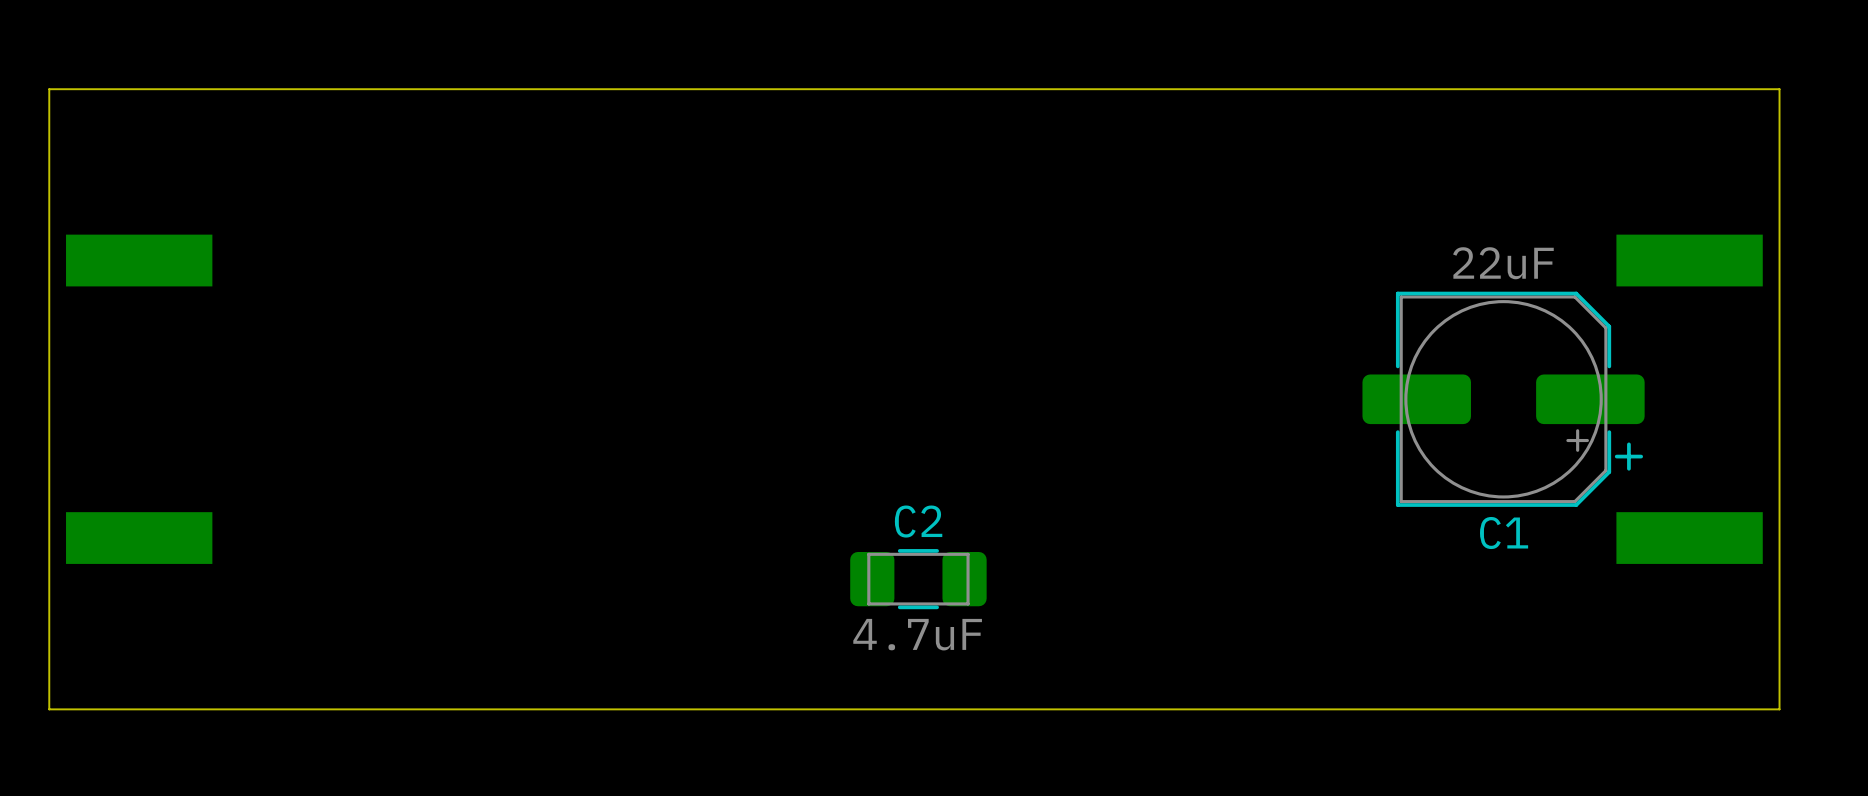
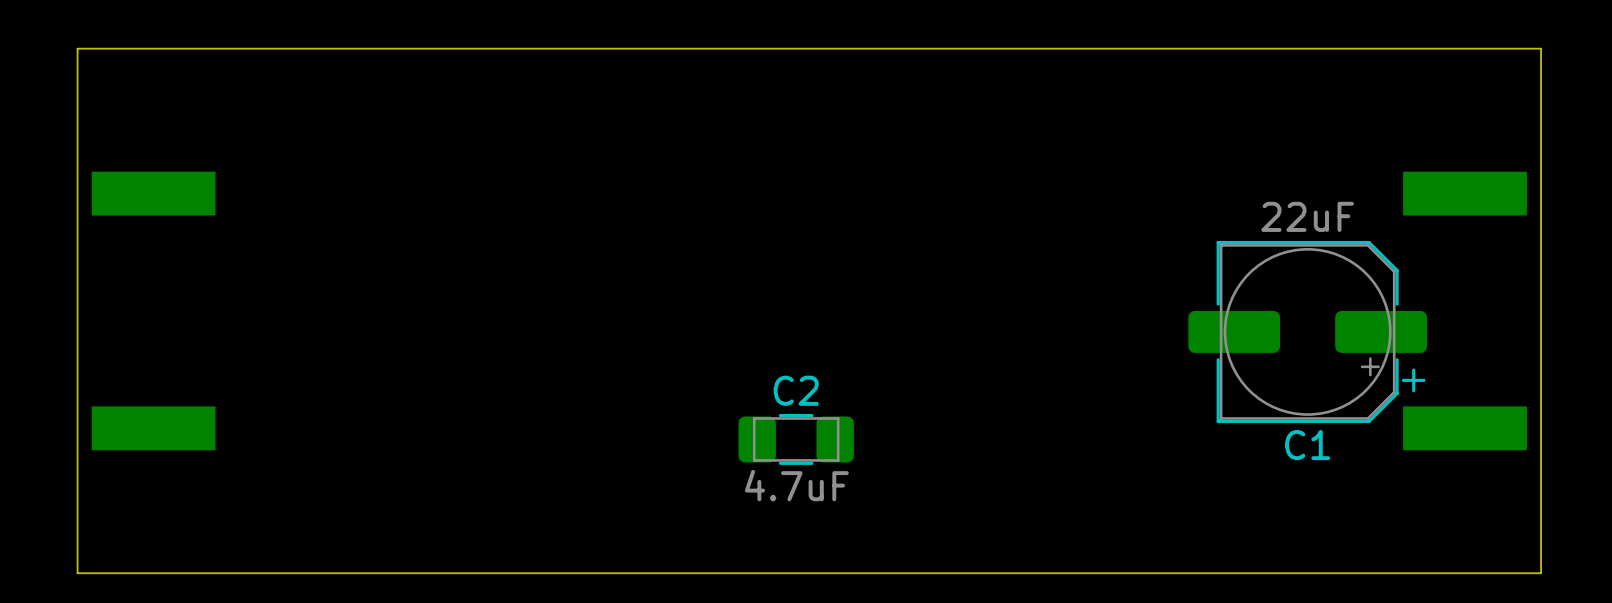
C1 position: (1503, 399) -> (1307, 331)
C2 position: (918, 579) -> (796, 439)

